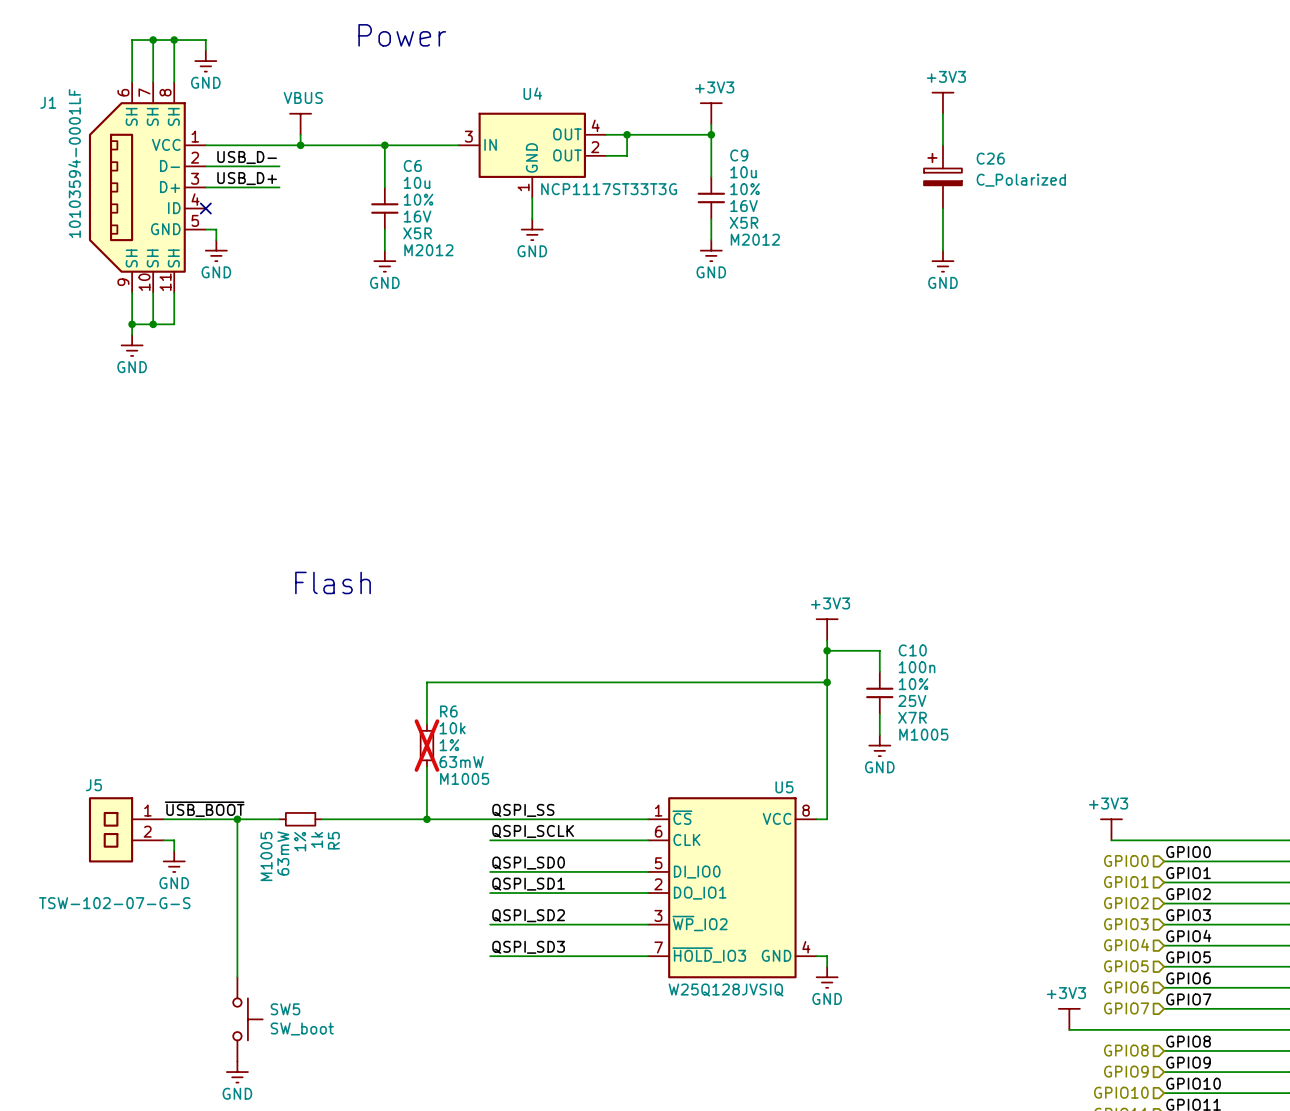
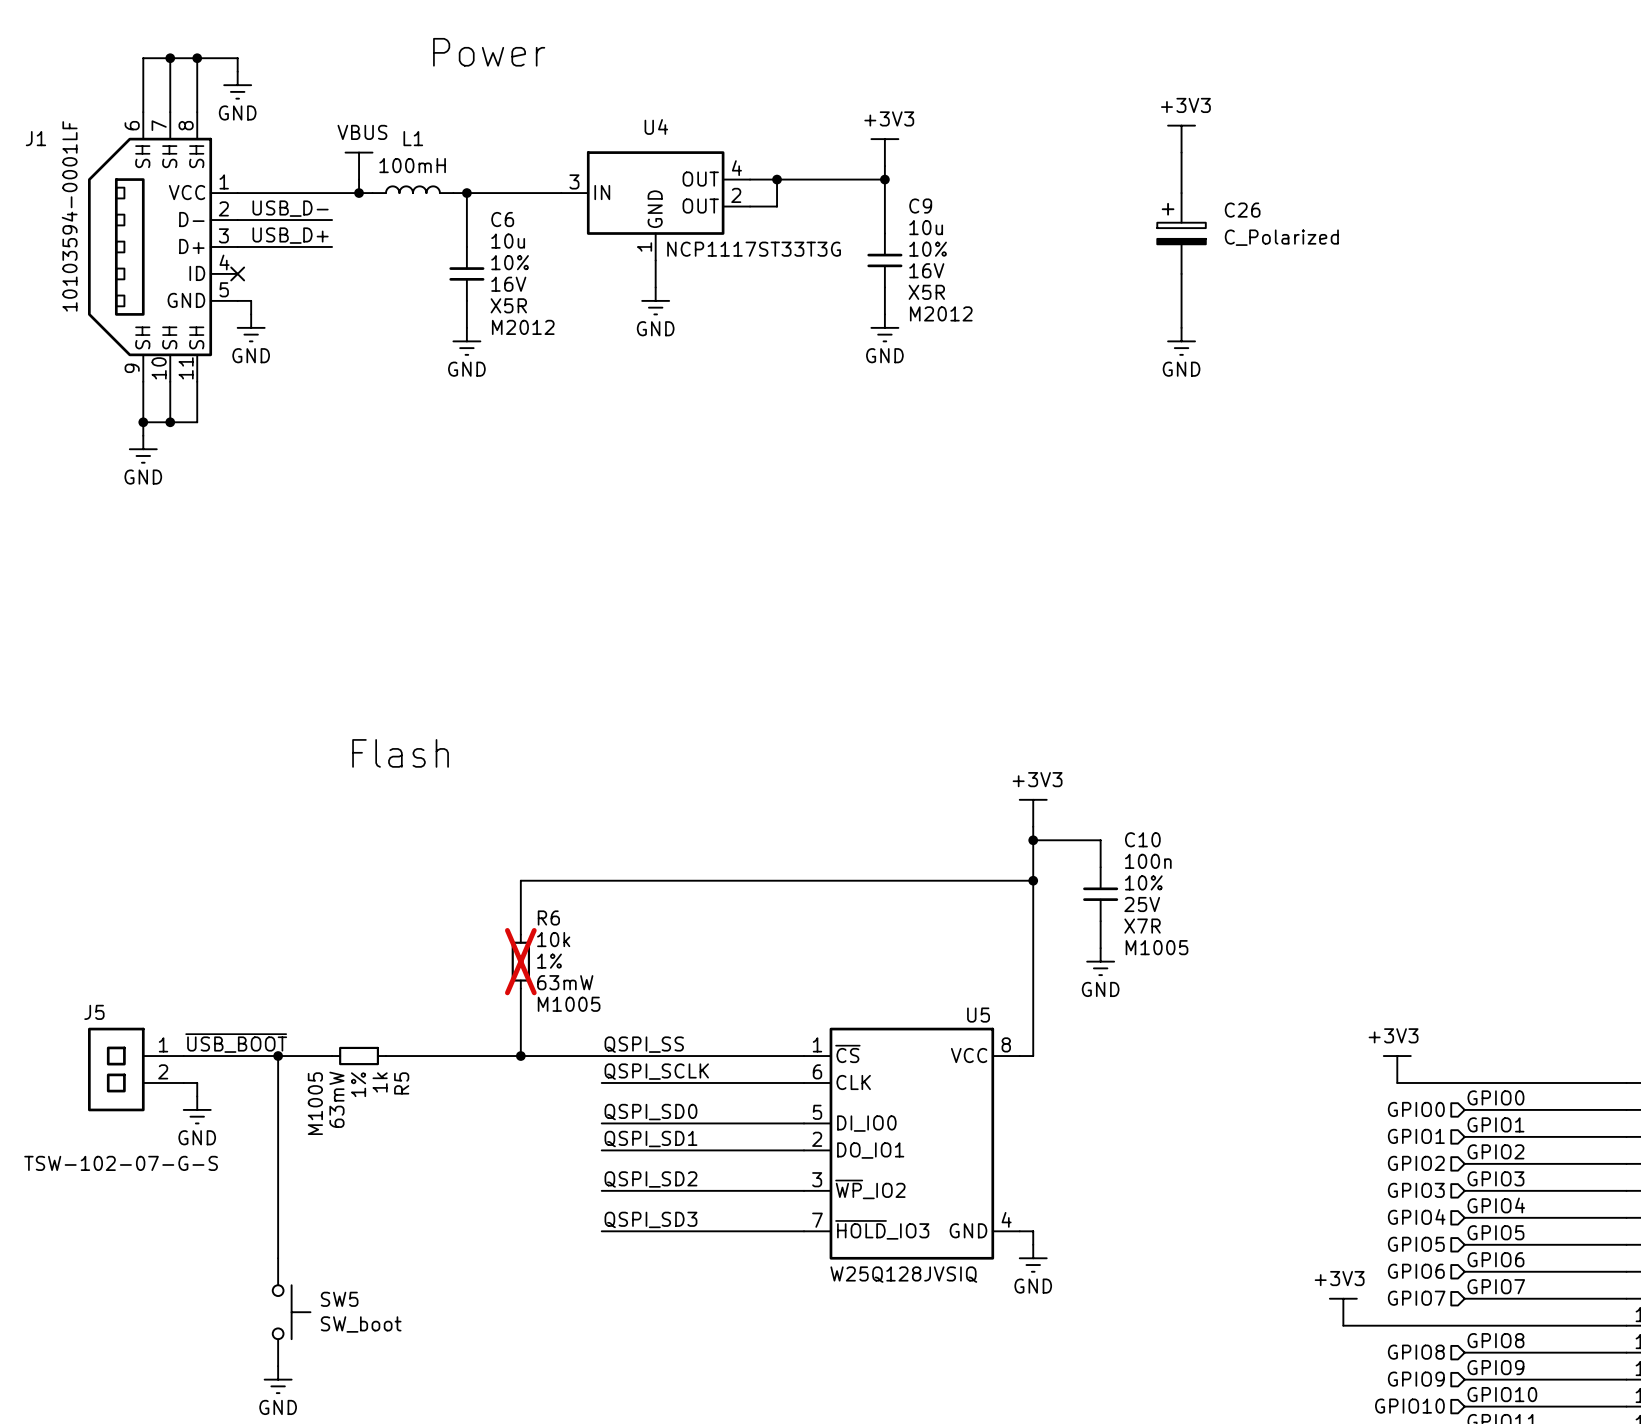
L1: none -> 100mH (412, 189)
wire: (311, 145) (374, 145) -> none

